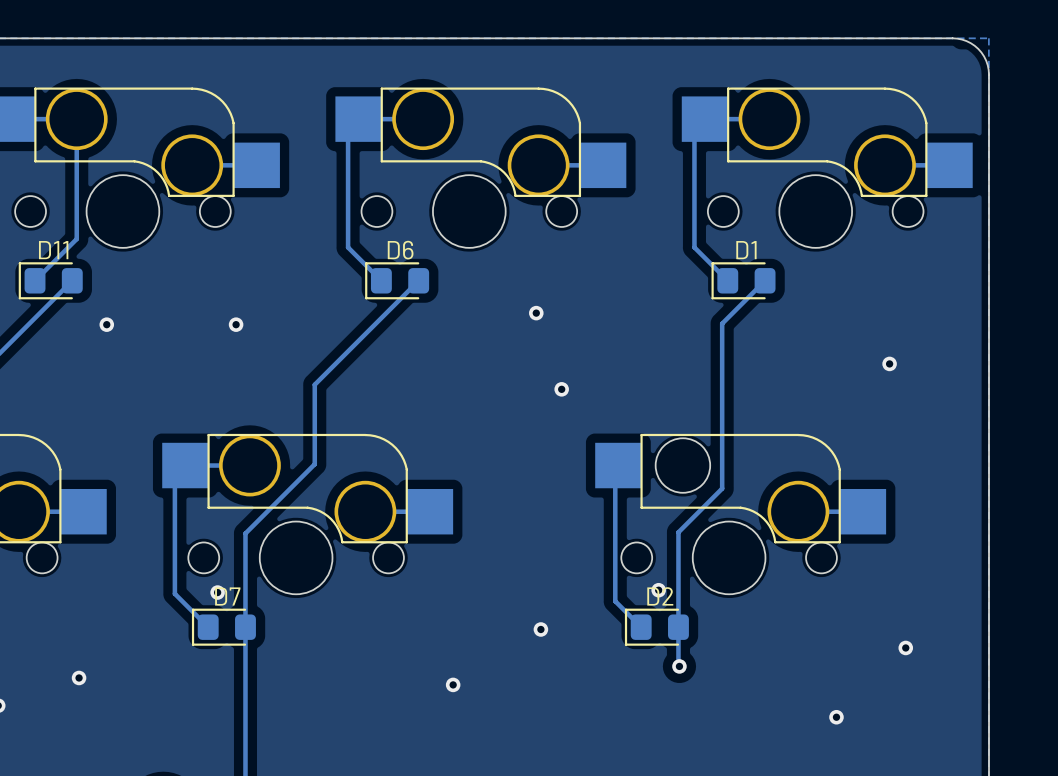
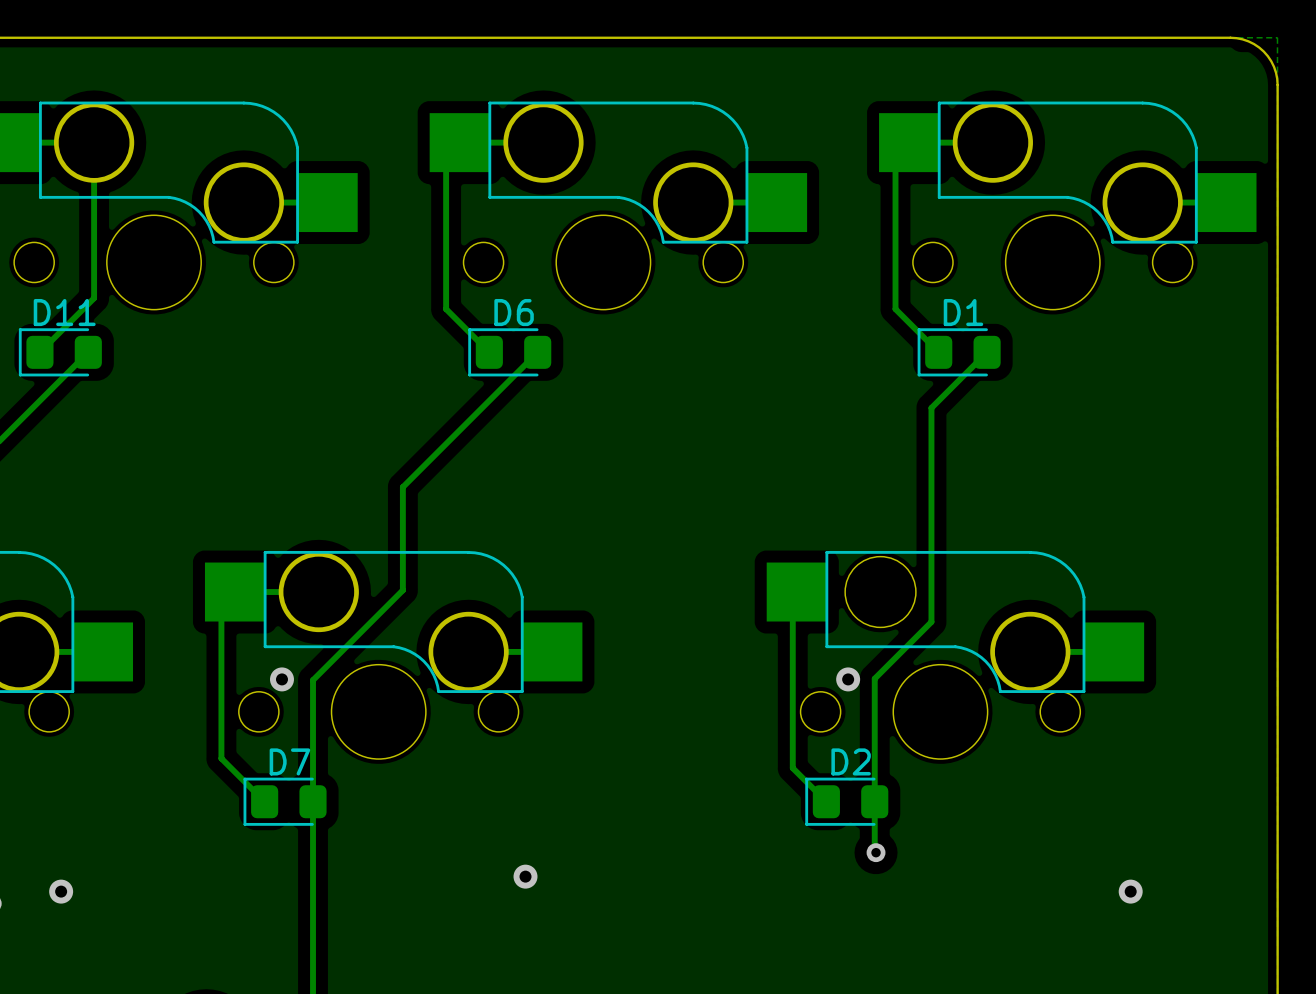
via: (536, 313) -> none
via: (106, 324) -> none
via: (236, 324) -> none
via: (889, 363) -> none
via: (561, 389) -> none
via: none -> (281, 679)
via: none -> (848, 679)
via: (658, 590) -> none
via: (217, 592) -> none
via: (540, 629) -> none
via: (905, 647) -> none
via: (79, 677) -> none
via: none -> (525, 876)
via: (453, 684) -> none
via: none -> (61, 891)
via: none -> (1130, 891)
via: (836, 717) -> none

